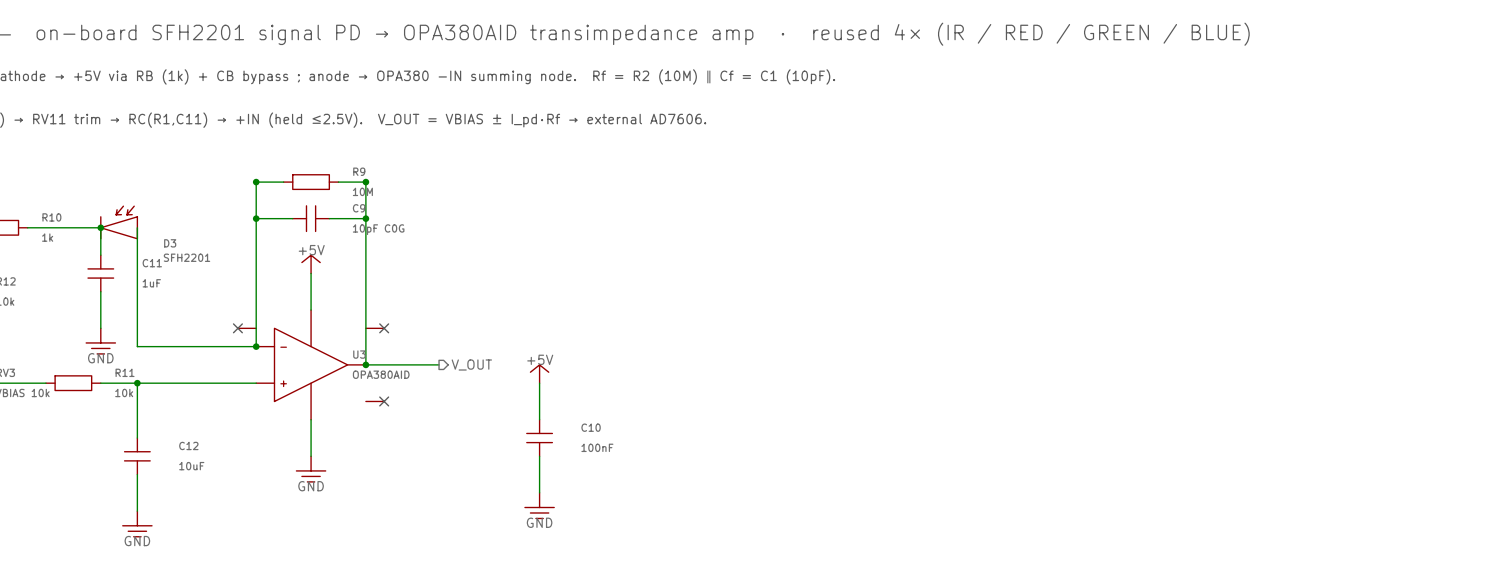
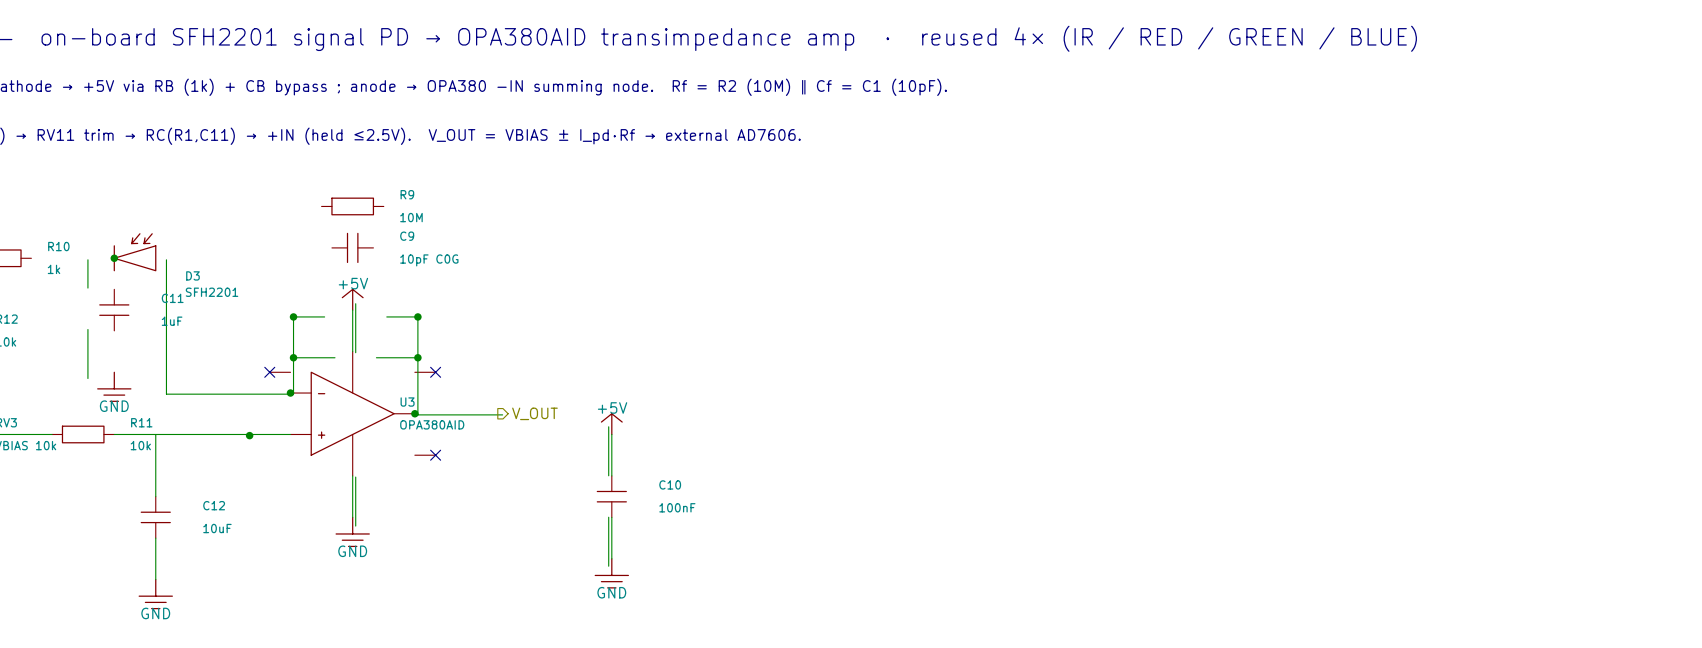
junction: (256, 182) -> none
wire: (283, 182) (256, 182) (256, 346) (137, 346) (137, 227) -> none
wire: (338, 182) (365, 182) (365, 364) (439, 364) -> none
junction: (365, 182) -> none
wire: (256, 218) (292, 218) -> (293, 357) (334, 357)
junction: (256, 218) -> none
wire: (329, 218) (365, 218) -> (376, 357) (417, 357)
junction: (365, 218) -> none
wire: (27, 227) (100, 227) (100, 255) -> none
wire: none -> (87, 259) (87, 288)
wire: none -> (166, 259) (166, 394) (293, 394) (293, 316) (324, 316)
wire: none -> (355, 303) (355, 352)
junction: none -> (293, 316)
wire: none -> (386, 316) (417, 316) (417, 414) (502, 414)
junction: none -> (417, 316)
wire: none -> (87, 329) (87, 378)
wire: (100, 291) (100, 328) -> none
junction: none -> (293, 357)
junction: none -> (417, 357)
wire: none -> (608, 426) (608, 475)
junction: (137, 383) -> none
junction: none -> (249, 435)
wire: none -> (355, 477) (355, 526)
wire: none -> (608, 517) (608, 566)

